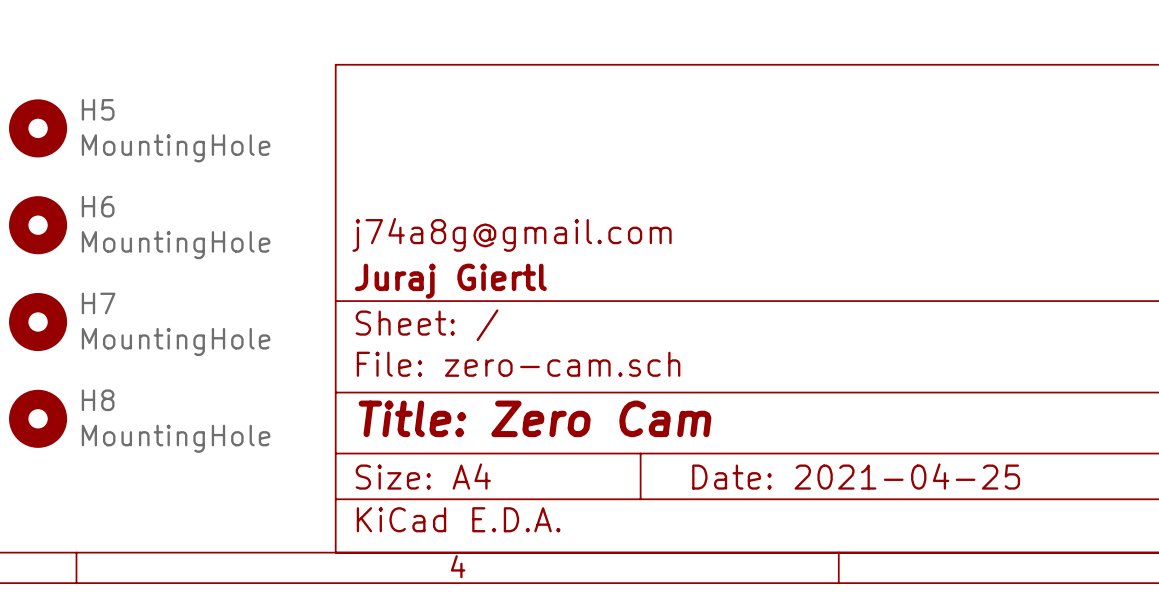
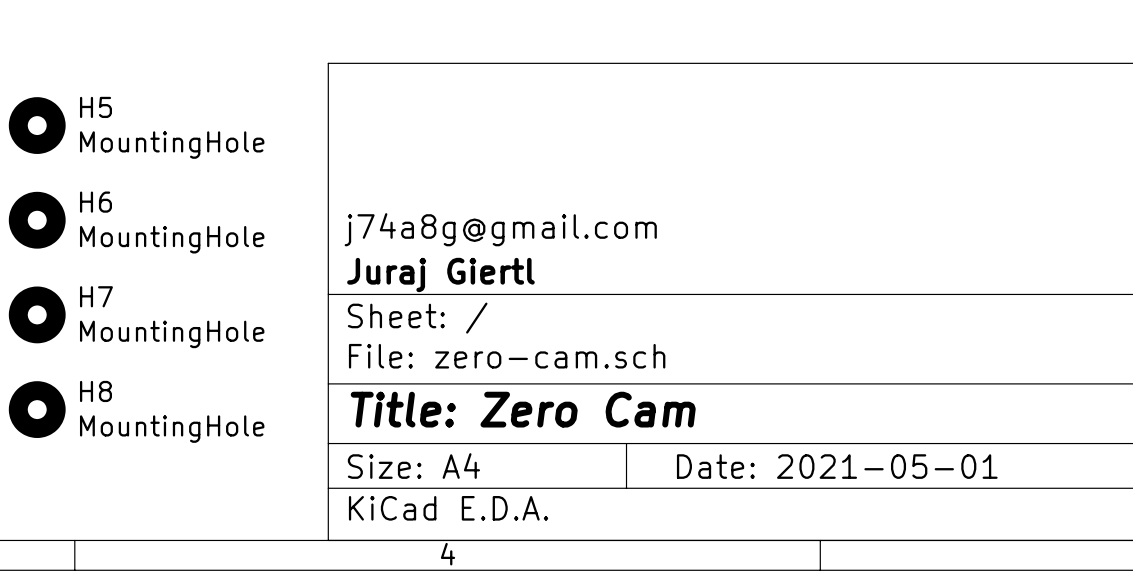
title block: Date: 2021-04-25 (856, 476) -> Date: 2021-05-01 (837, 466)

